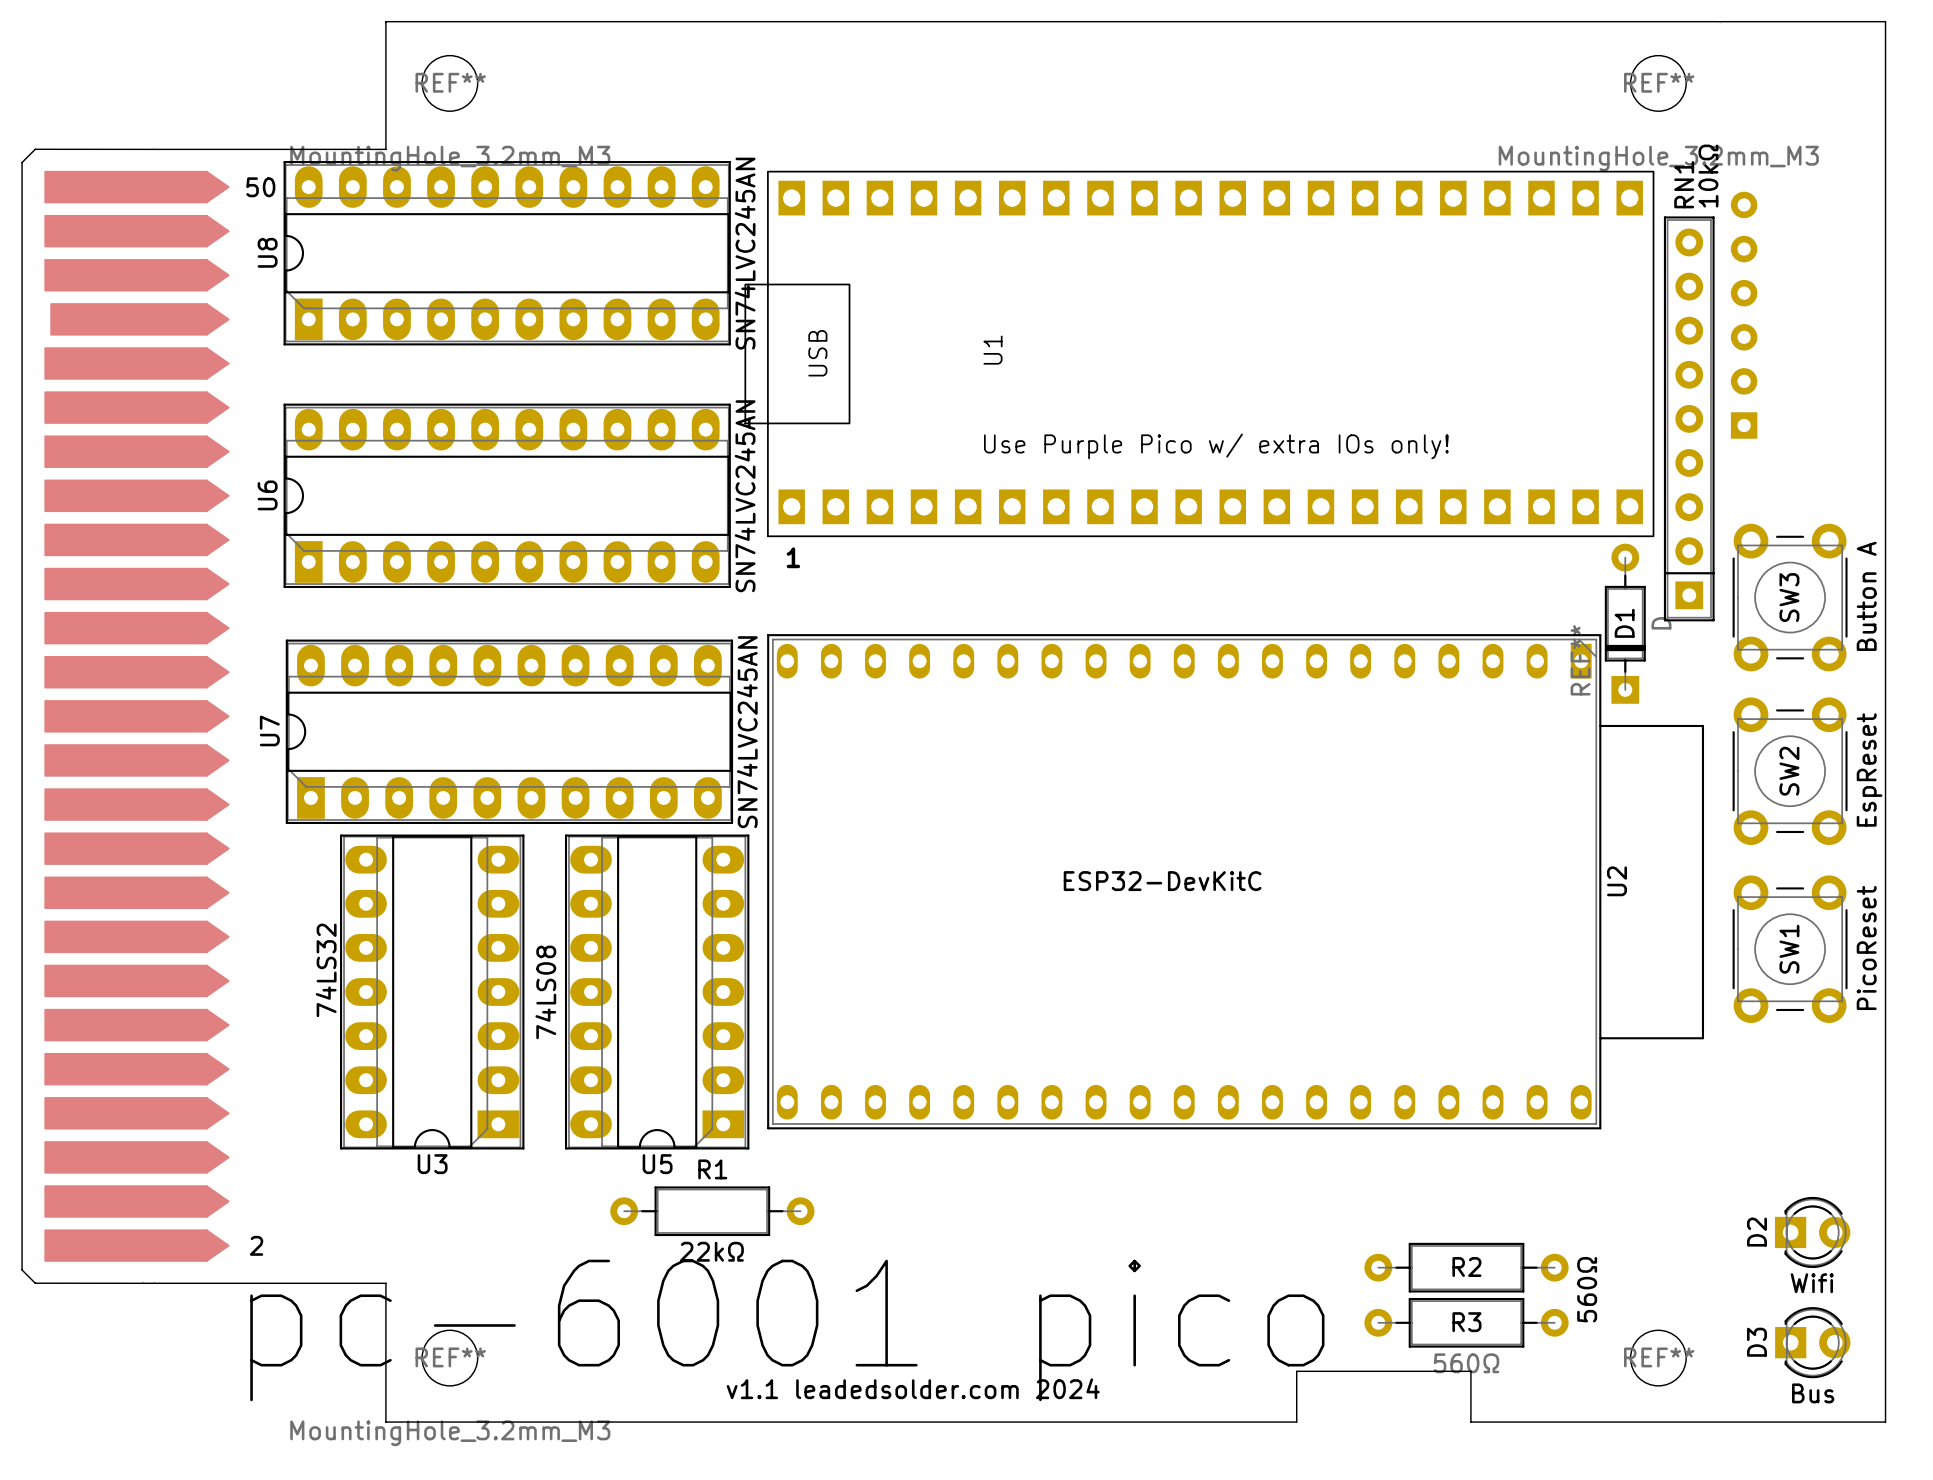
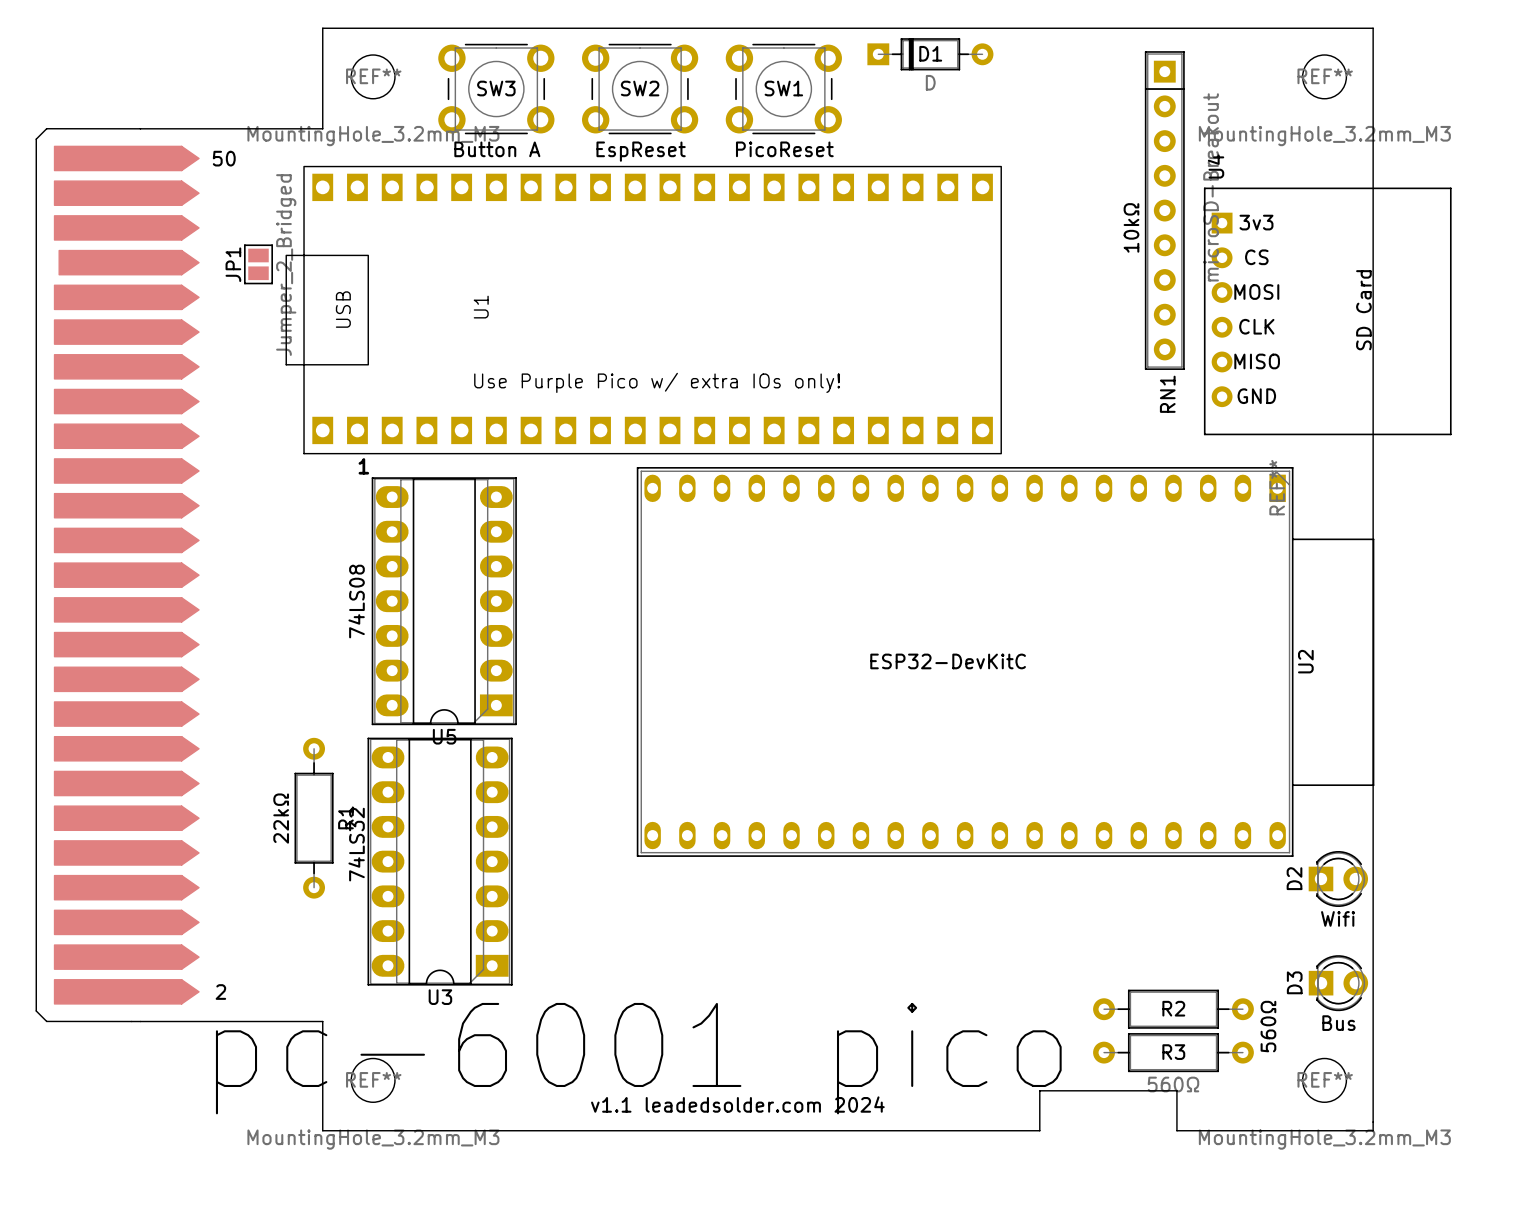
board edge: (1720, 21) (1885, 21) (1885, 1422) (1720, 1422) -> (1373, 28) (1373, 1130)
RN1 value position: 10kΩ (1708, 176) -> 10kΩ (1131, 227)
U8: SN74LVC245AN (507, 253) -> none
U4 side: bottom (1744, 315) -> top (1327, 311)
JP1: none -> Jumper_2_Bridged (258, 264)
U1 position: (1199, 353) -> (643, 310)
RN1 rotation: 0° (1689, 418) -> 180° (1164, 210)
RN1 position: (1689, 418) -> (1164, 210)
U6: SN74LVC245AN (507, 495) -> none
text position: 1 (793, 557) -> 1 (363, 466)
SW3 rotation: 0° (1790, 597) -> 90° clockwise (496, 89)
SW3 position: (1790, 597) -> (496, 89)
D1 rotation: 0° (1625, 623) -> 90° clockwise (930, 54)
D1 position: (1625, 623) -> (930, 54)
U7: SN74LVC245AN (509, 731) -> none
SW2 rotation: 0° (1790, 771) -> 90° clockwise (640, 89)
SW2 position: (1790, 771) -> (640, 89)
U2 position: (1235, 881) -> (1005, 661)
SW1 rotation: 0° (1790, 949) -> 90° clockwise (783, 89)
SW1 position: (1790, 949) -> (783, 89)
U3 position: (432, 992) -> (440, 861)
U5 position: (657, 992) -> (444, 601)
R1 rotation: 0° (712, 1211) -> 90° clockwise (314, 818)
R1 position: (712, 1211) -> (314, 818)
D2 position: (1812, 1232) -> (1338, 878)
D3 position: (1812, 1342) -> (1338, 983)
REF** value: none -> MountingHole_3.2mm_M3 (1324, 1139)

